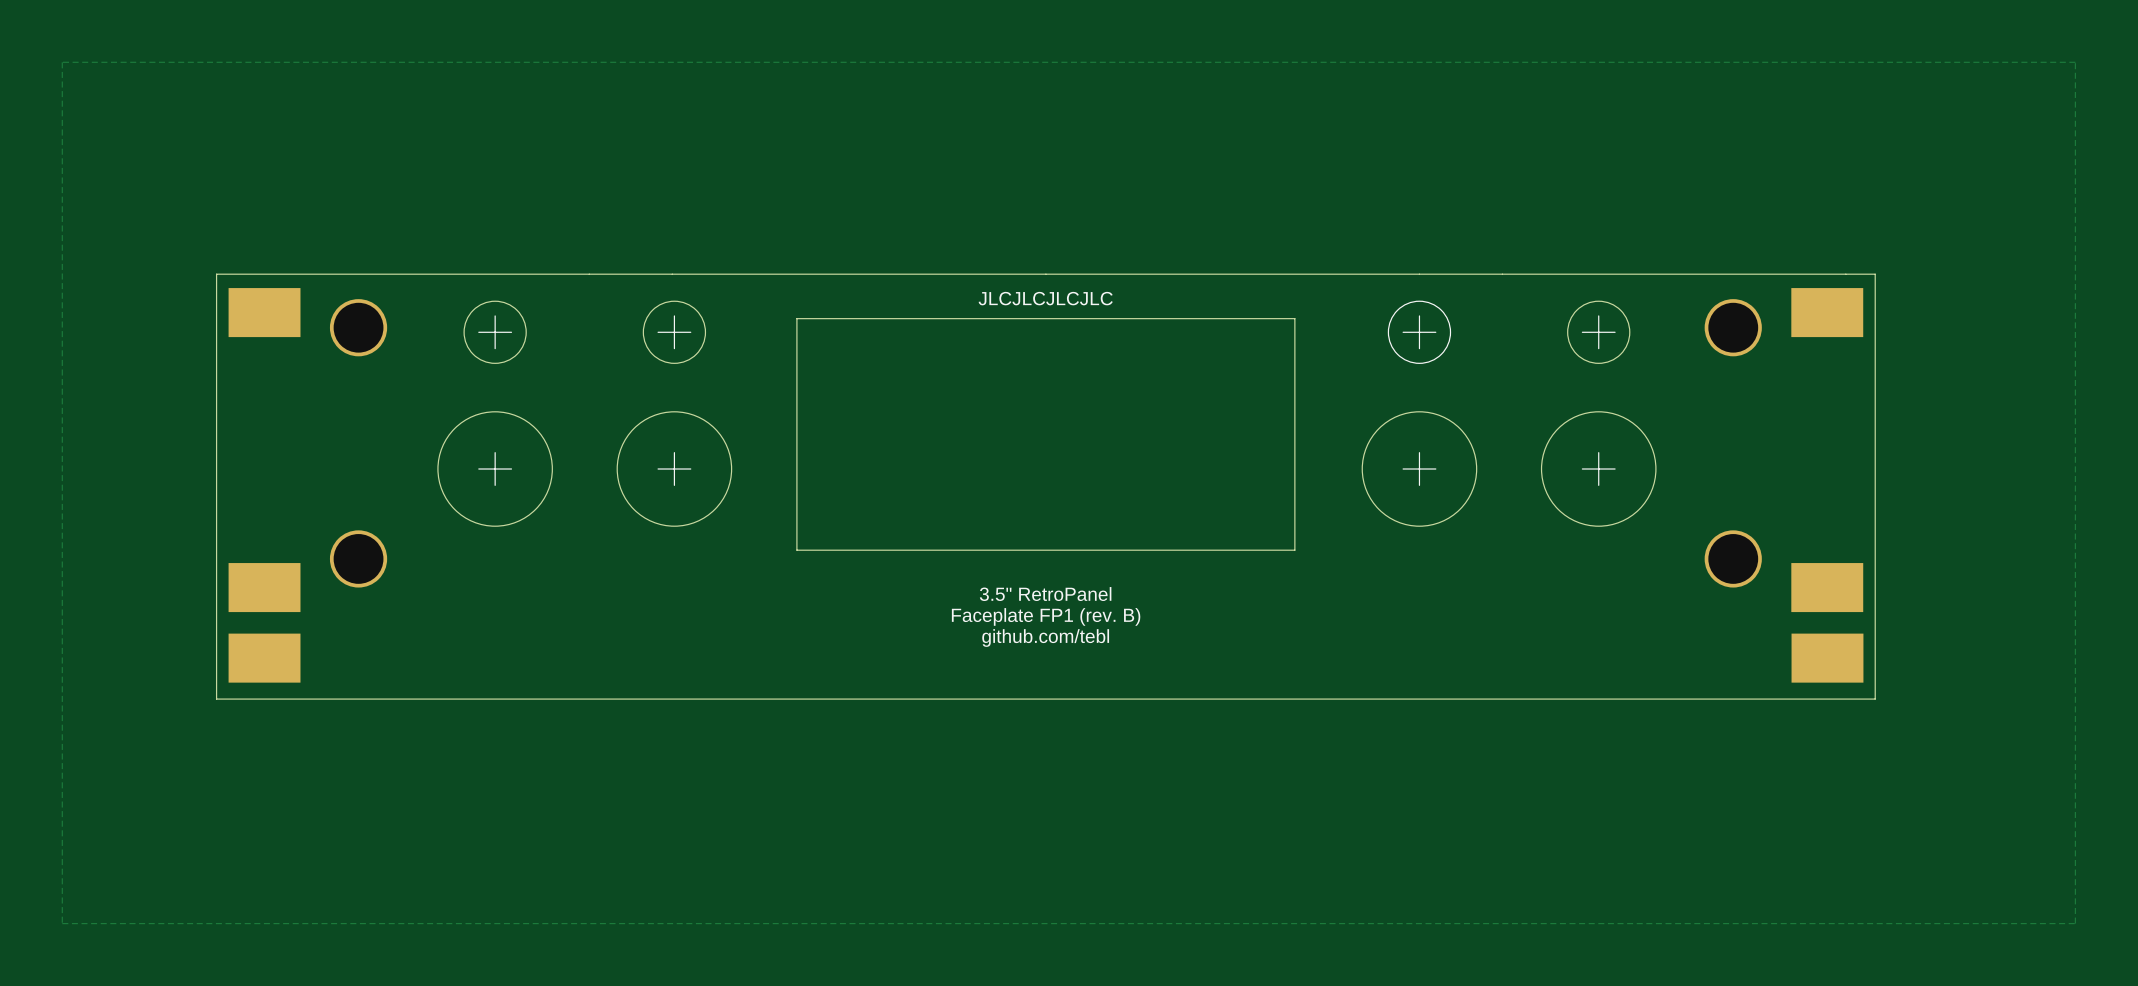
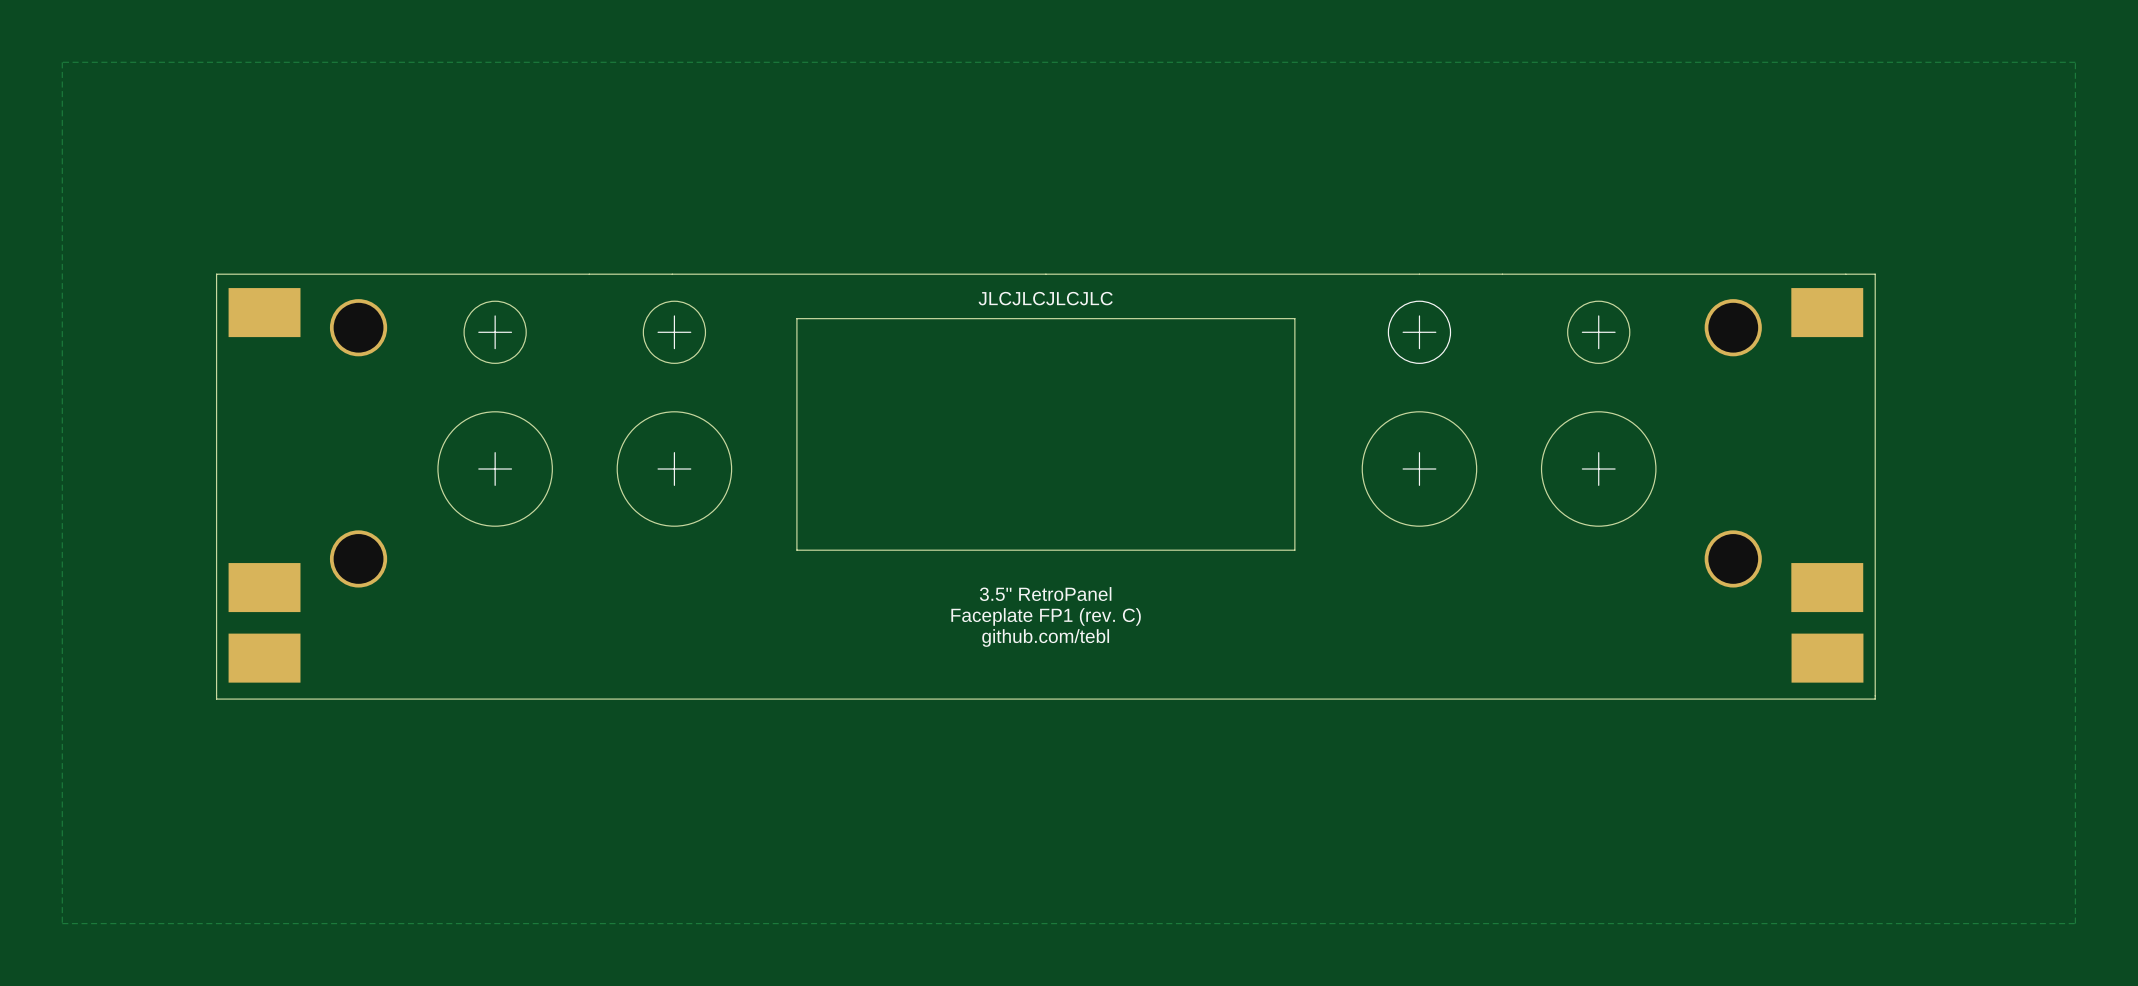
text: Faceplate FP1 (rev. B) (1046, 616) -> Faceplate FP1 (rev. C) (1046, 616)

